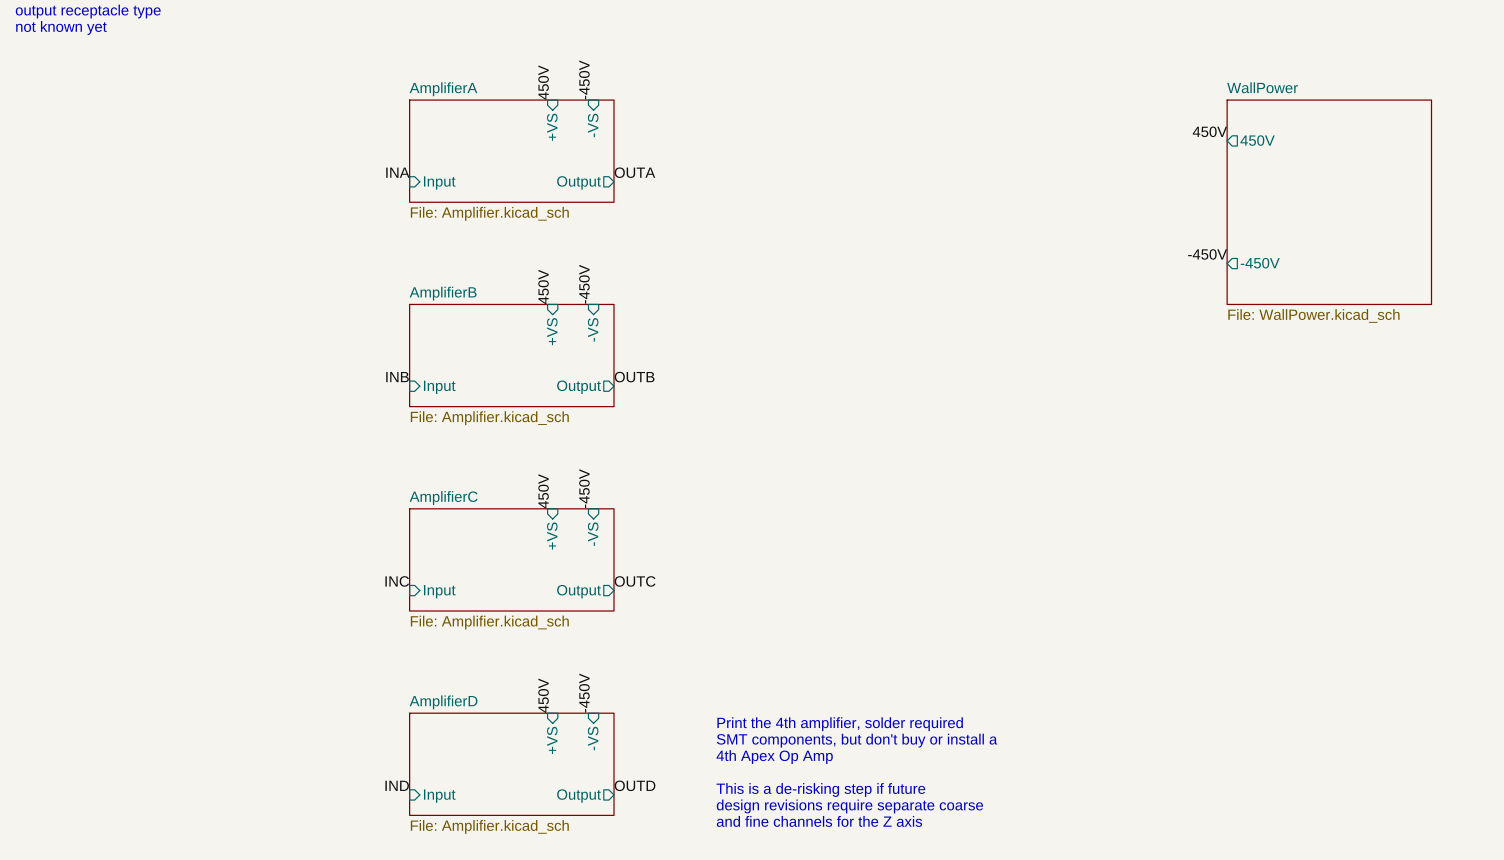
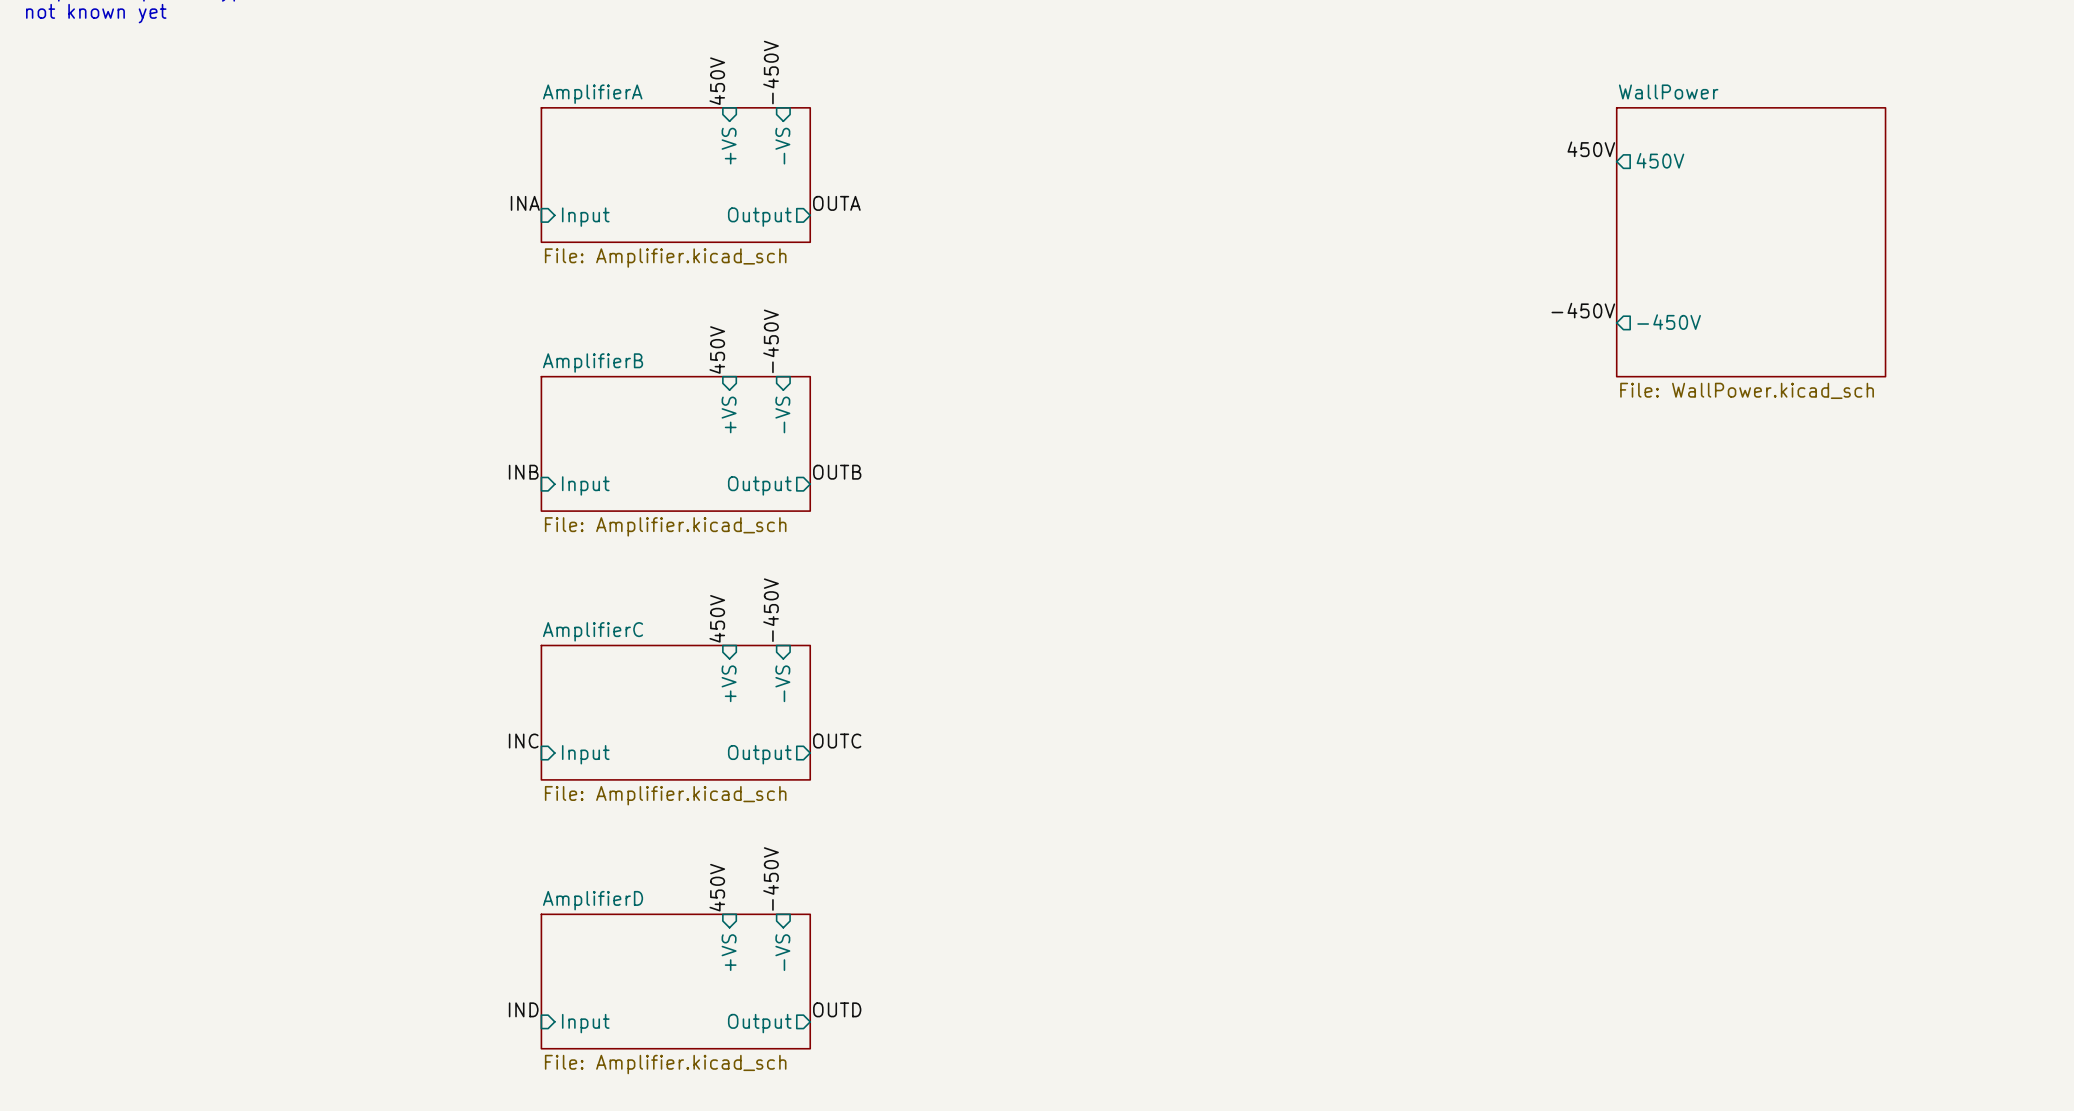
text: Print the 4th amplifier, solder required (840, 724) -> none
text: SMT components, but don't buy or install a (857, 740) -> none
text: 4th Apex Op Amp (774, 757) -> none
text: This is a de-risking step if future (820, 789) -> none
text: design revisions require separate coarse (849, 806) -> none
text: and fine channels for the Z axis (819, 821) -> none

